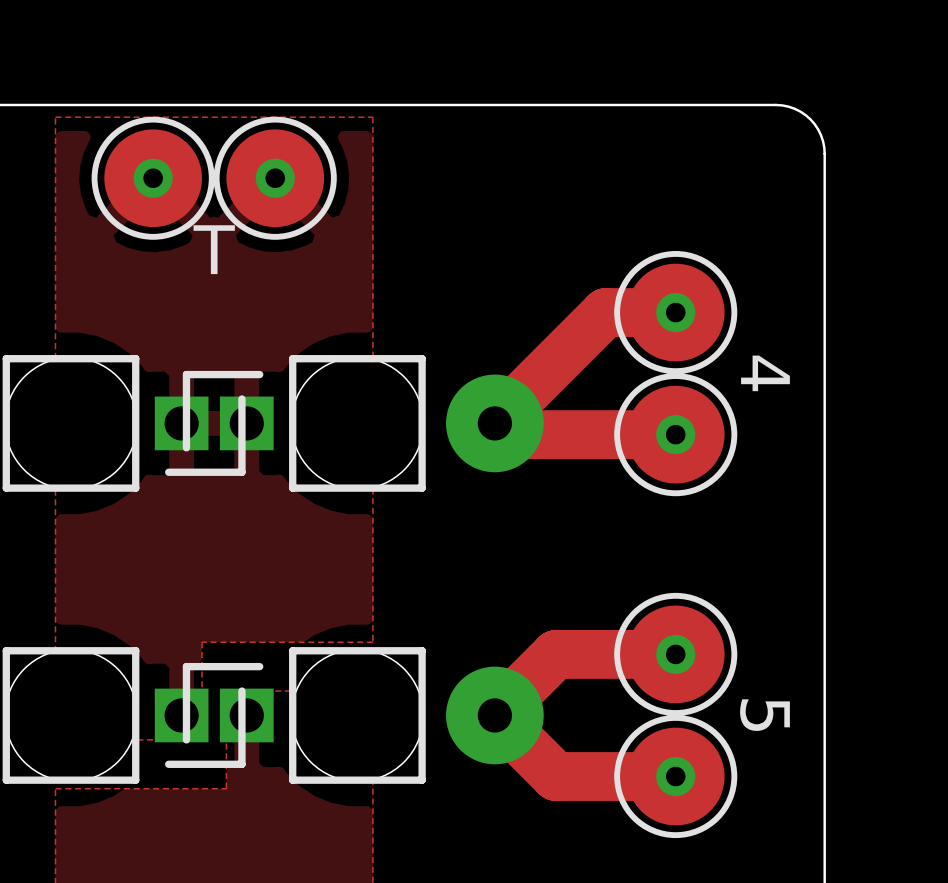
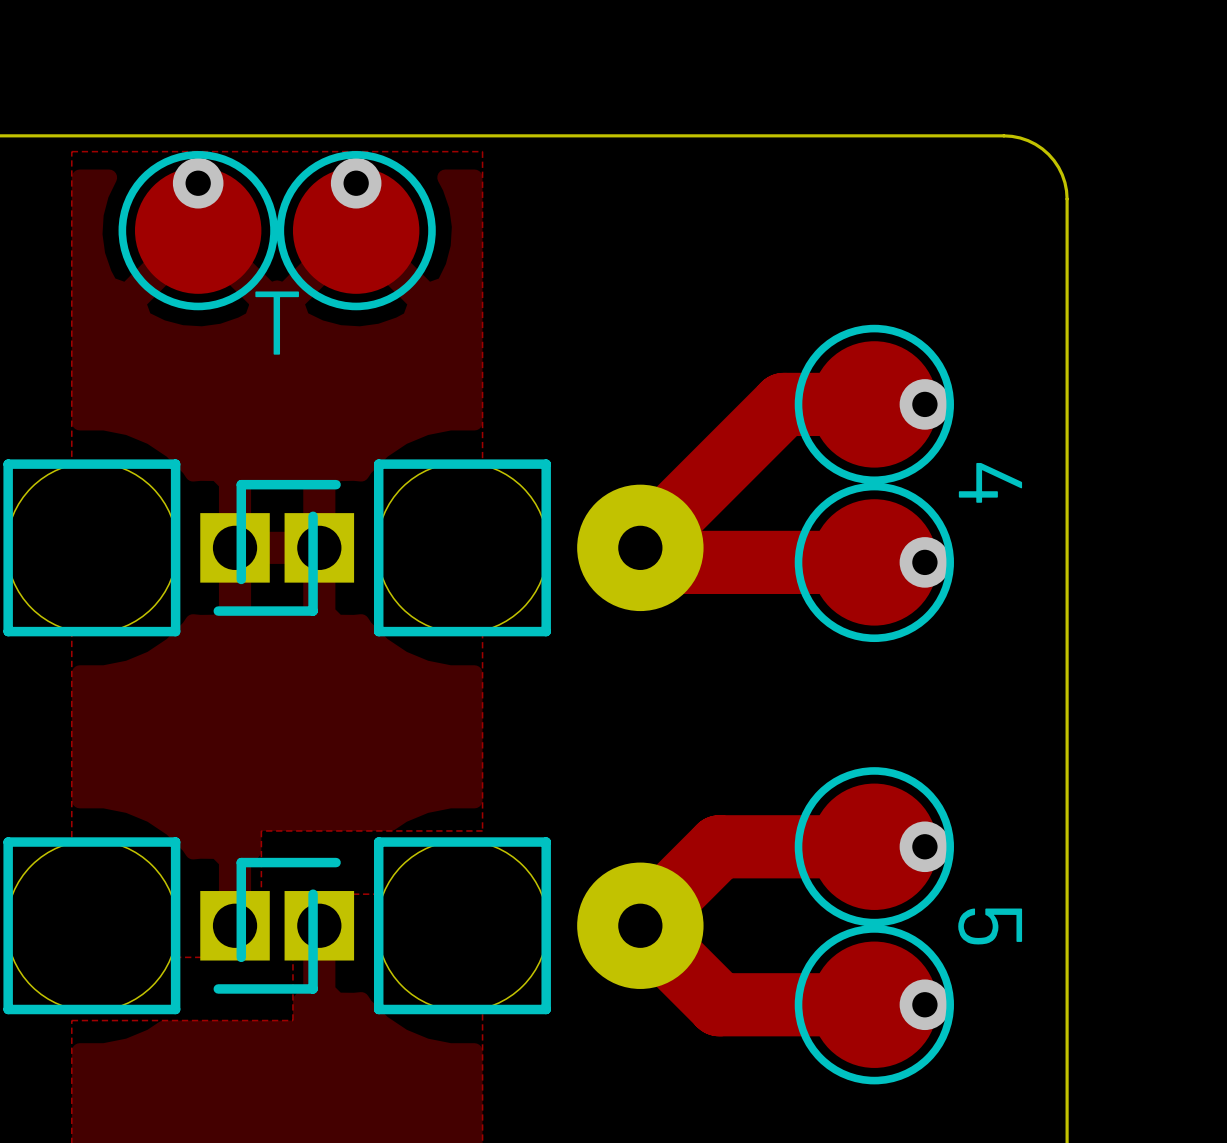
via position: (153, 178) -> (198, 183)
via position: (275, 178) -> (356, 183)
via position: (675, 312) -> (924, 404)
via position: (675, 434) -> (924, 562)
via position: (675, 654) -> (924, 846)
via position: (675, 776) -> (924, 1004)

